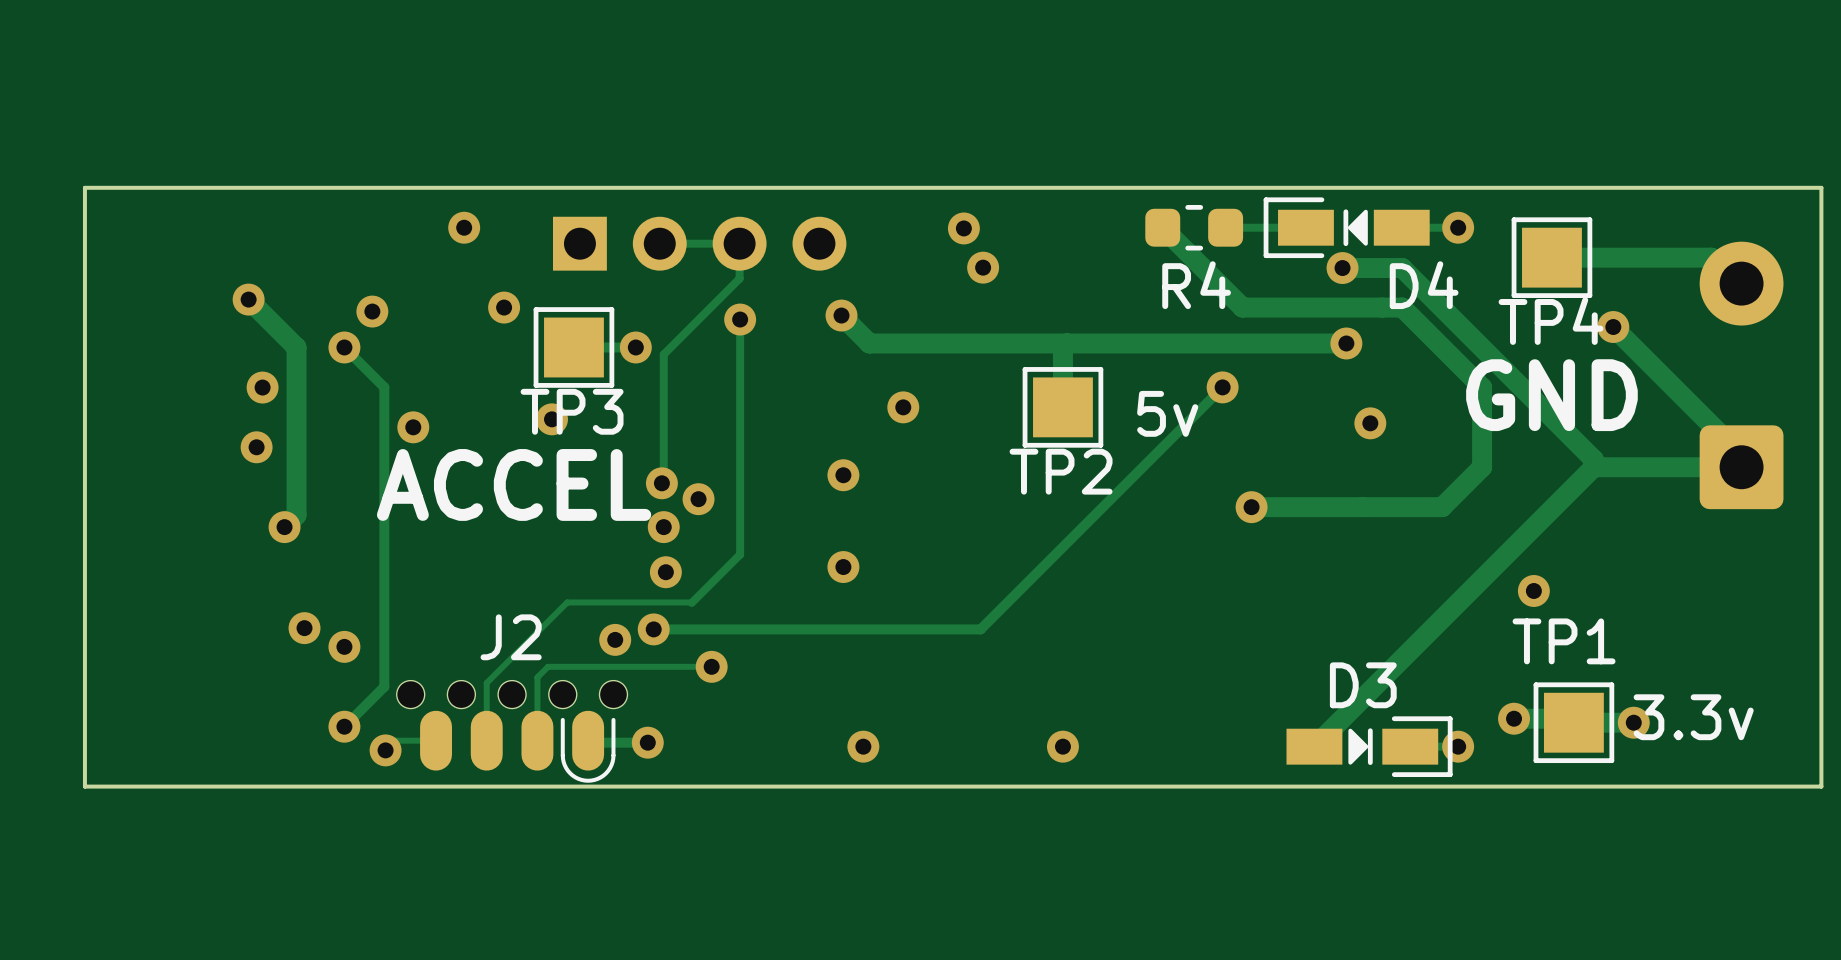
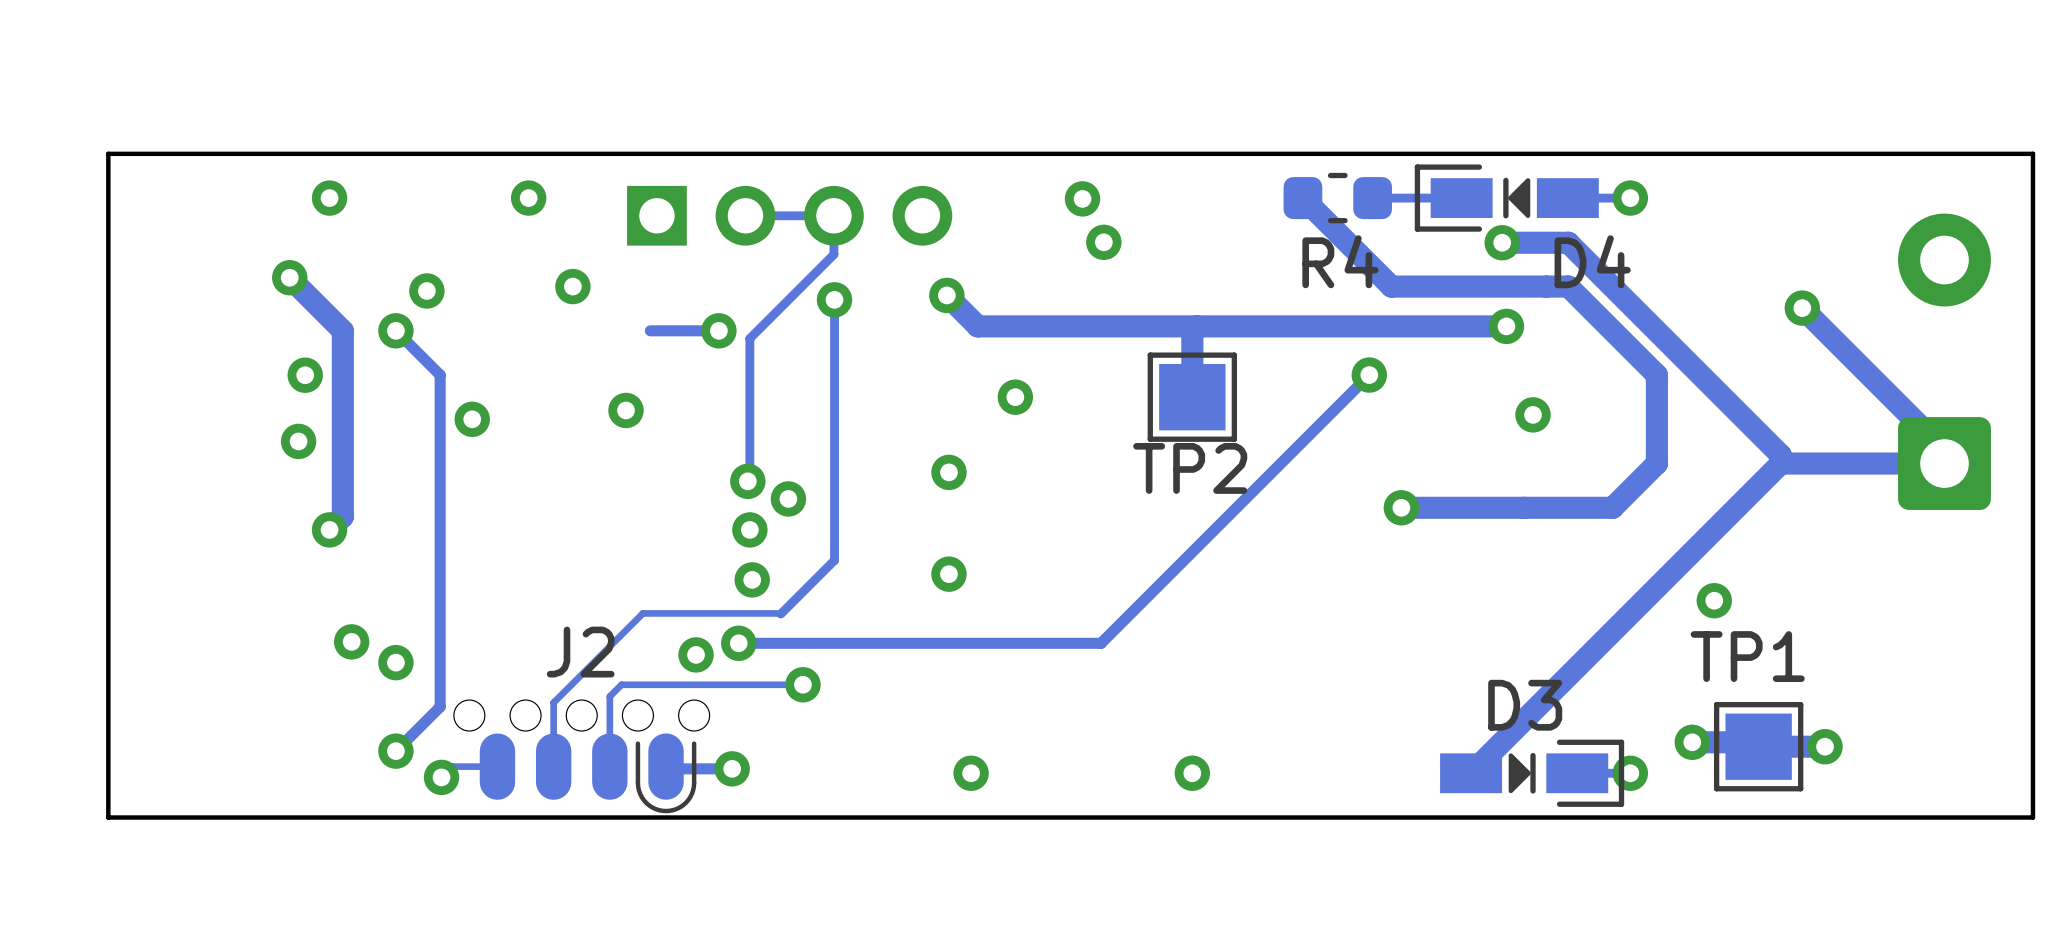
via: none -> (329, 198)
track: (1551, 257) (1711, 257) (1737, 283) (1741, 283) -> none
TP4: (1551, 257) -> none
TP3: (573, 347) -> none
text: GND (1551, 395) -> none
text: 5v (1167, 413) -> none
text: ACCEL (514, 484) -> none
text: 3.3v (1693, 717) -> none

